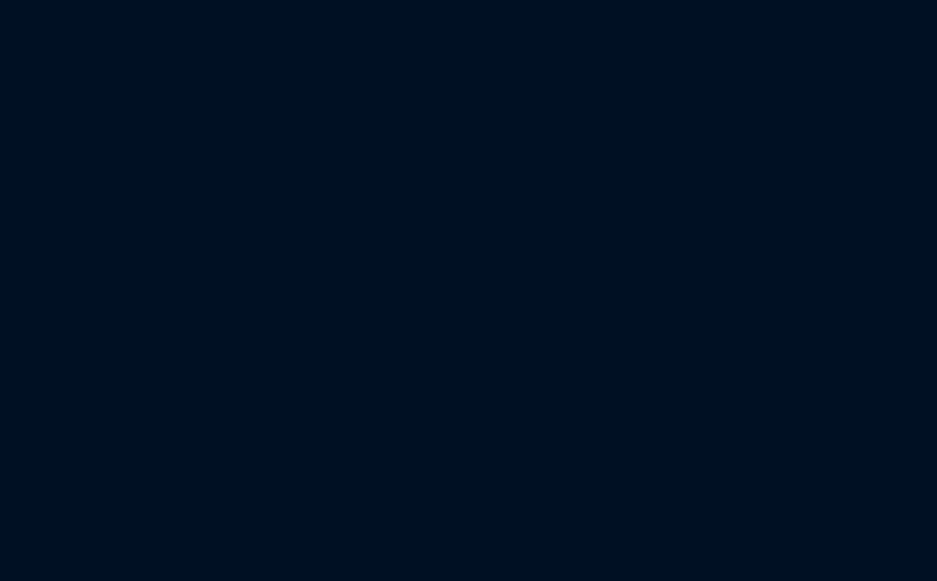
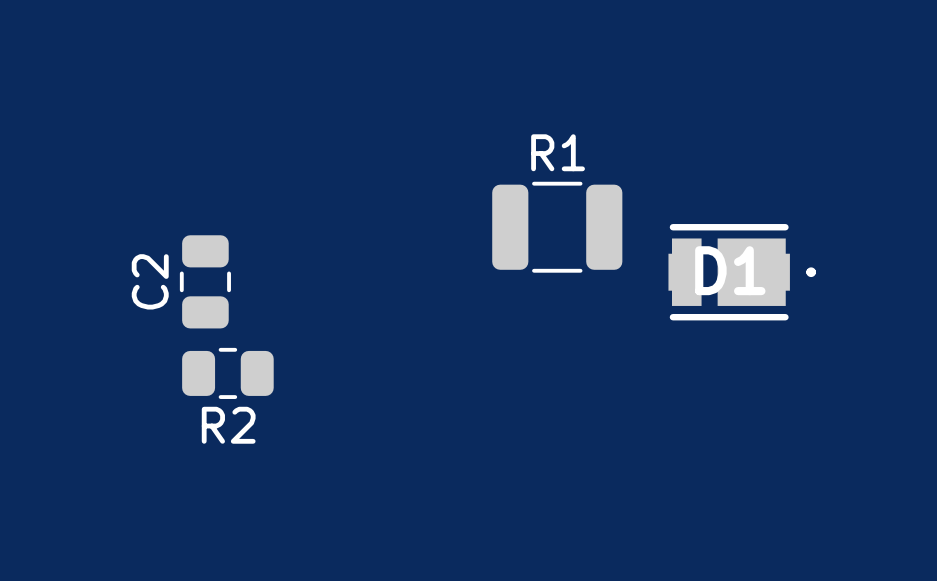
R1: none -> (557, 227)
part: none -> (742, 272)
C2: none -> (205, 281)
R2: none -> (227, 373)

